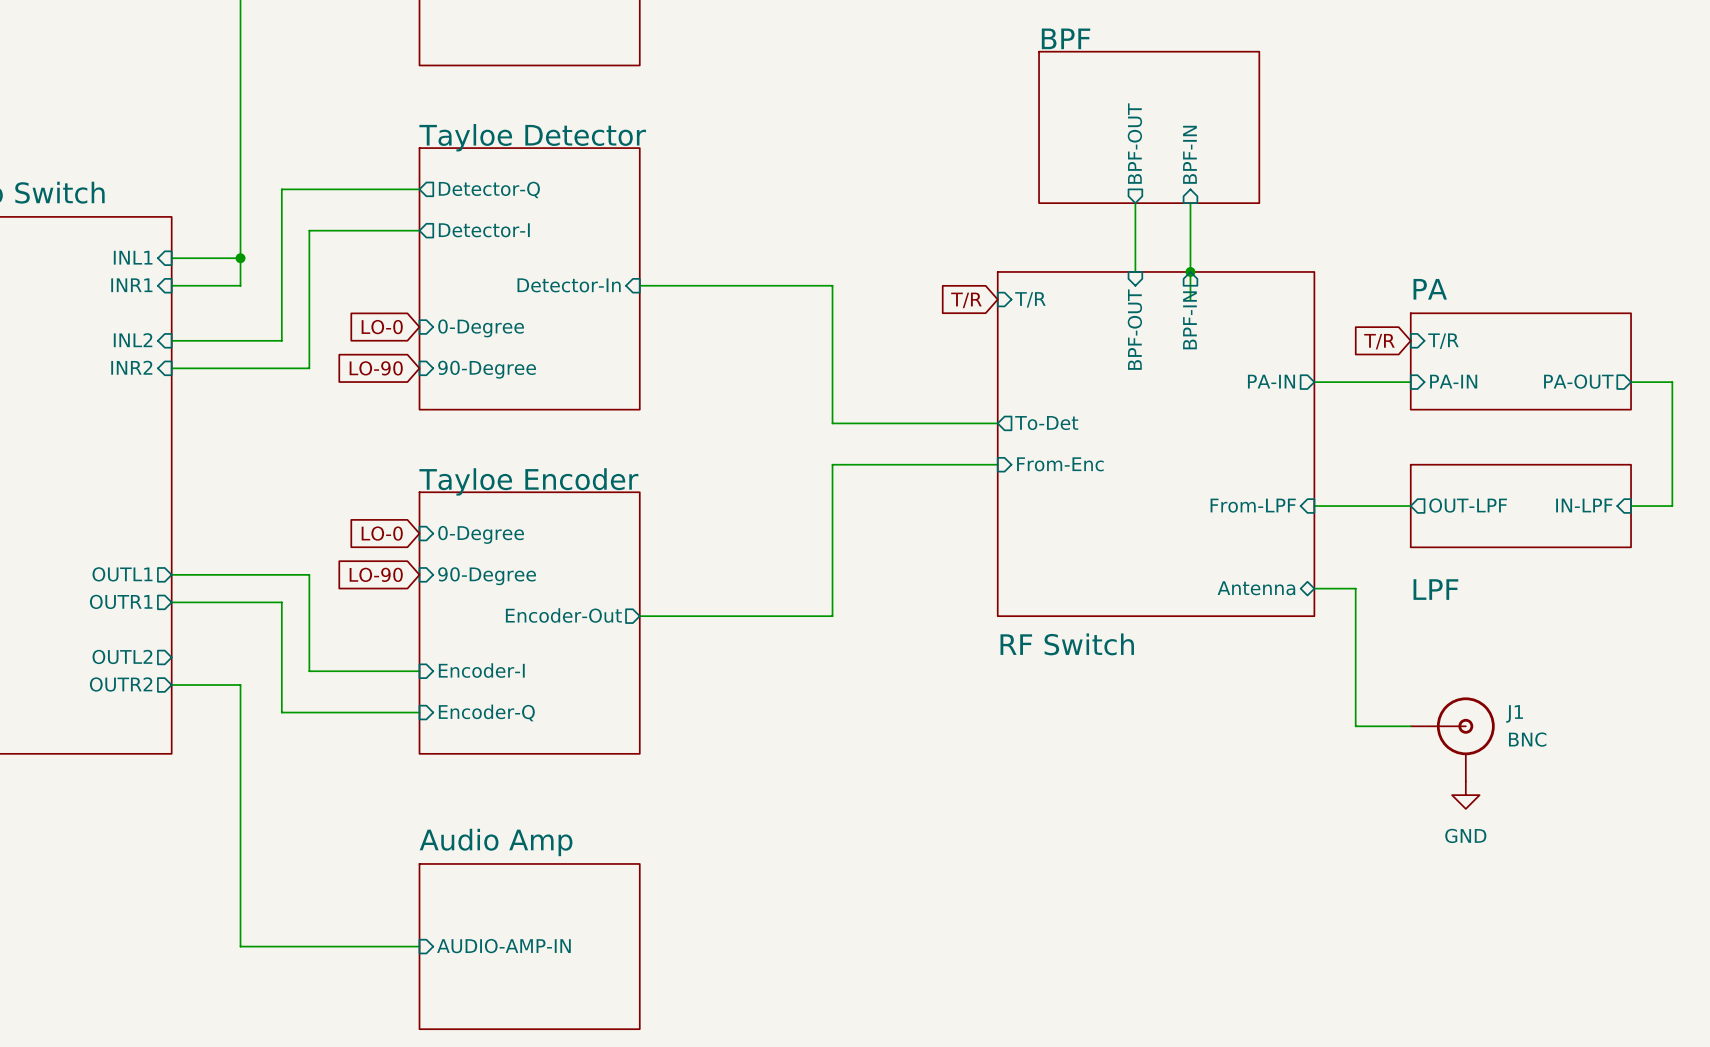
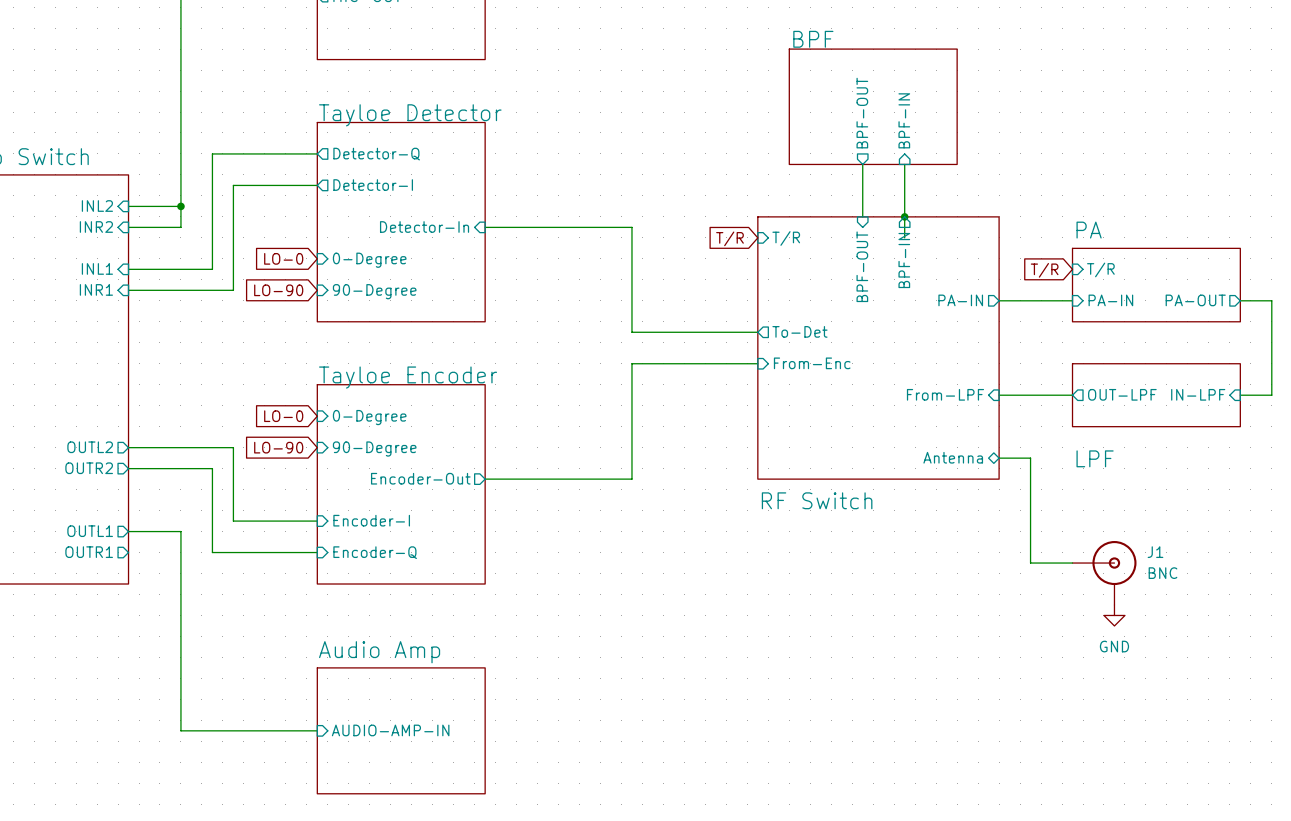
sheet pin: INL1 (133, 257) -> INL2 (97, 206)
sheet pin: INR1 (131, 285) -> INR2 (96, 226)
sheet pin: INL2 (133, 340) -> INL1 (97, 268)
sheet pin: INR2 (131, 367) -> INR1 (96, 289)
sheet pin: OUTL1 (122, 574) -> OUTL2 (90, 447)
sheet pin: OUTR1 (121, 601) -> OUTR2 (89, 468)
sheet pin: OUTL2 (122, 656) -> none
sheet pin: OUTR2 (121, 684) -> OUTL1 (90, 531)
sheet pin: none -> OUTR1 (89, 552)

